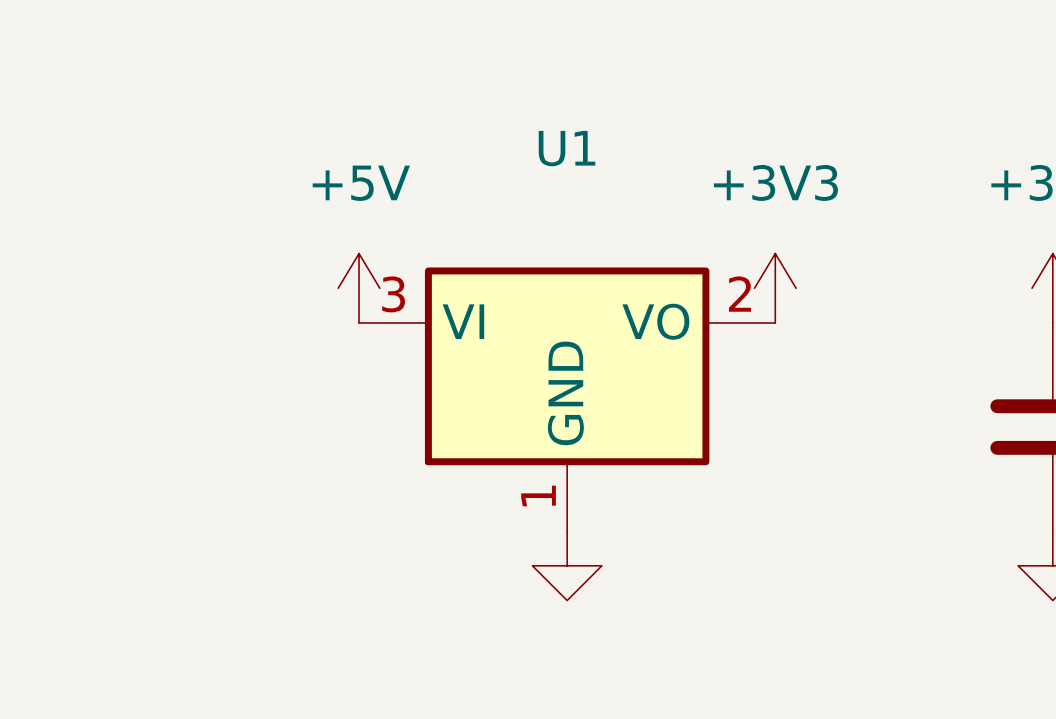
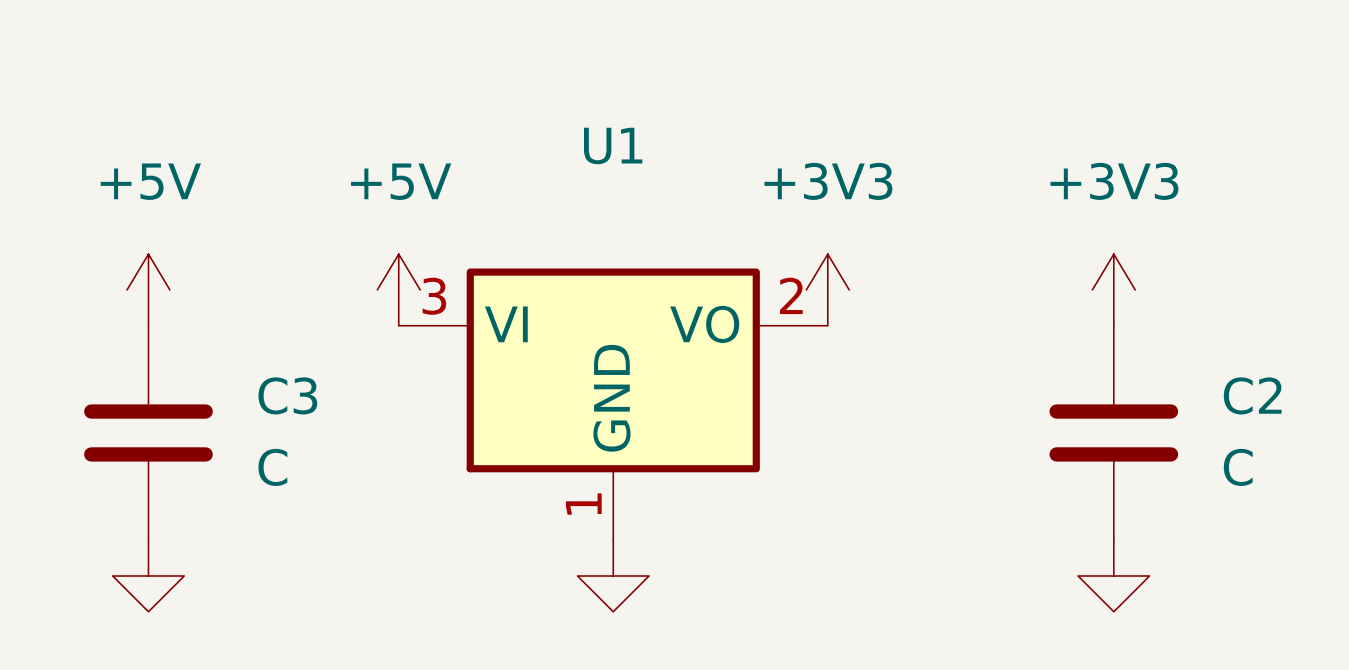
power symbol: none -> +5V (148, 289)
C3: none -> C (148, 432)
power symbol: none -> (148, 575)

